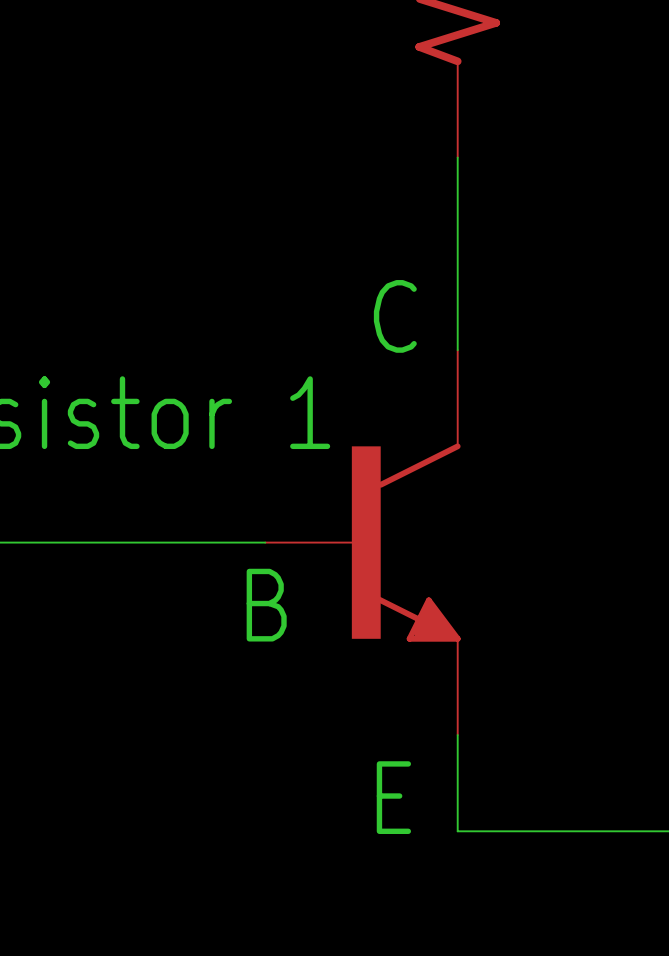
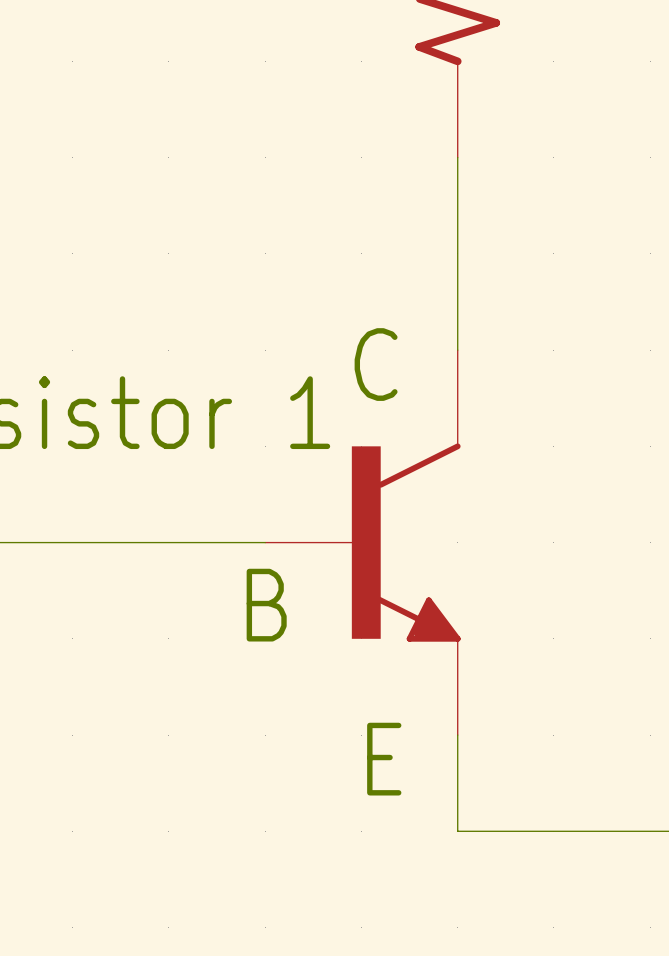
text position: C (395, 316) -> C (376, 364)
text position: E (393, 797) -> E (384, 759)

